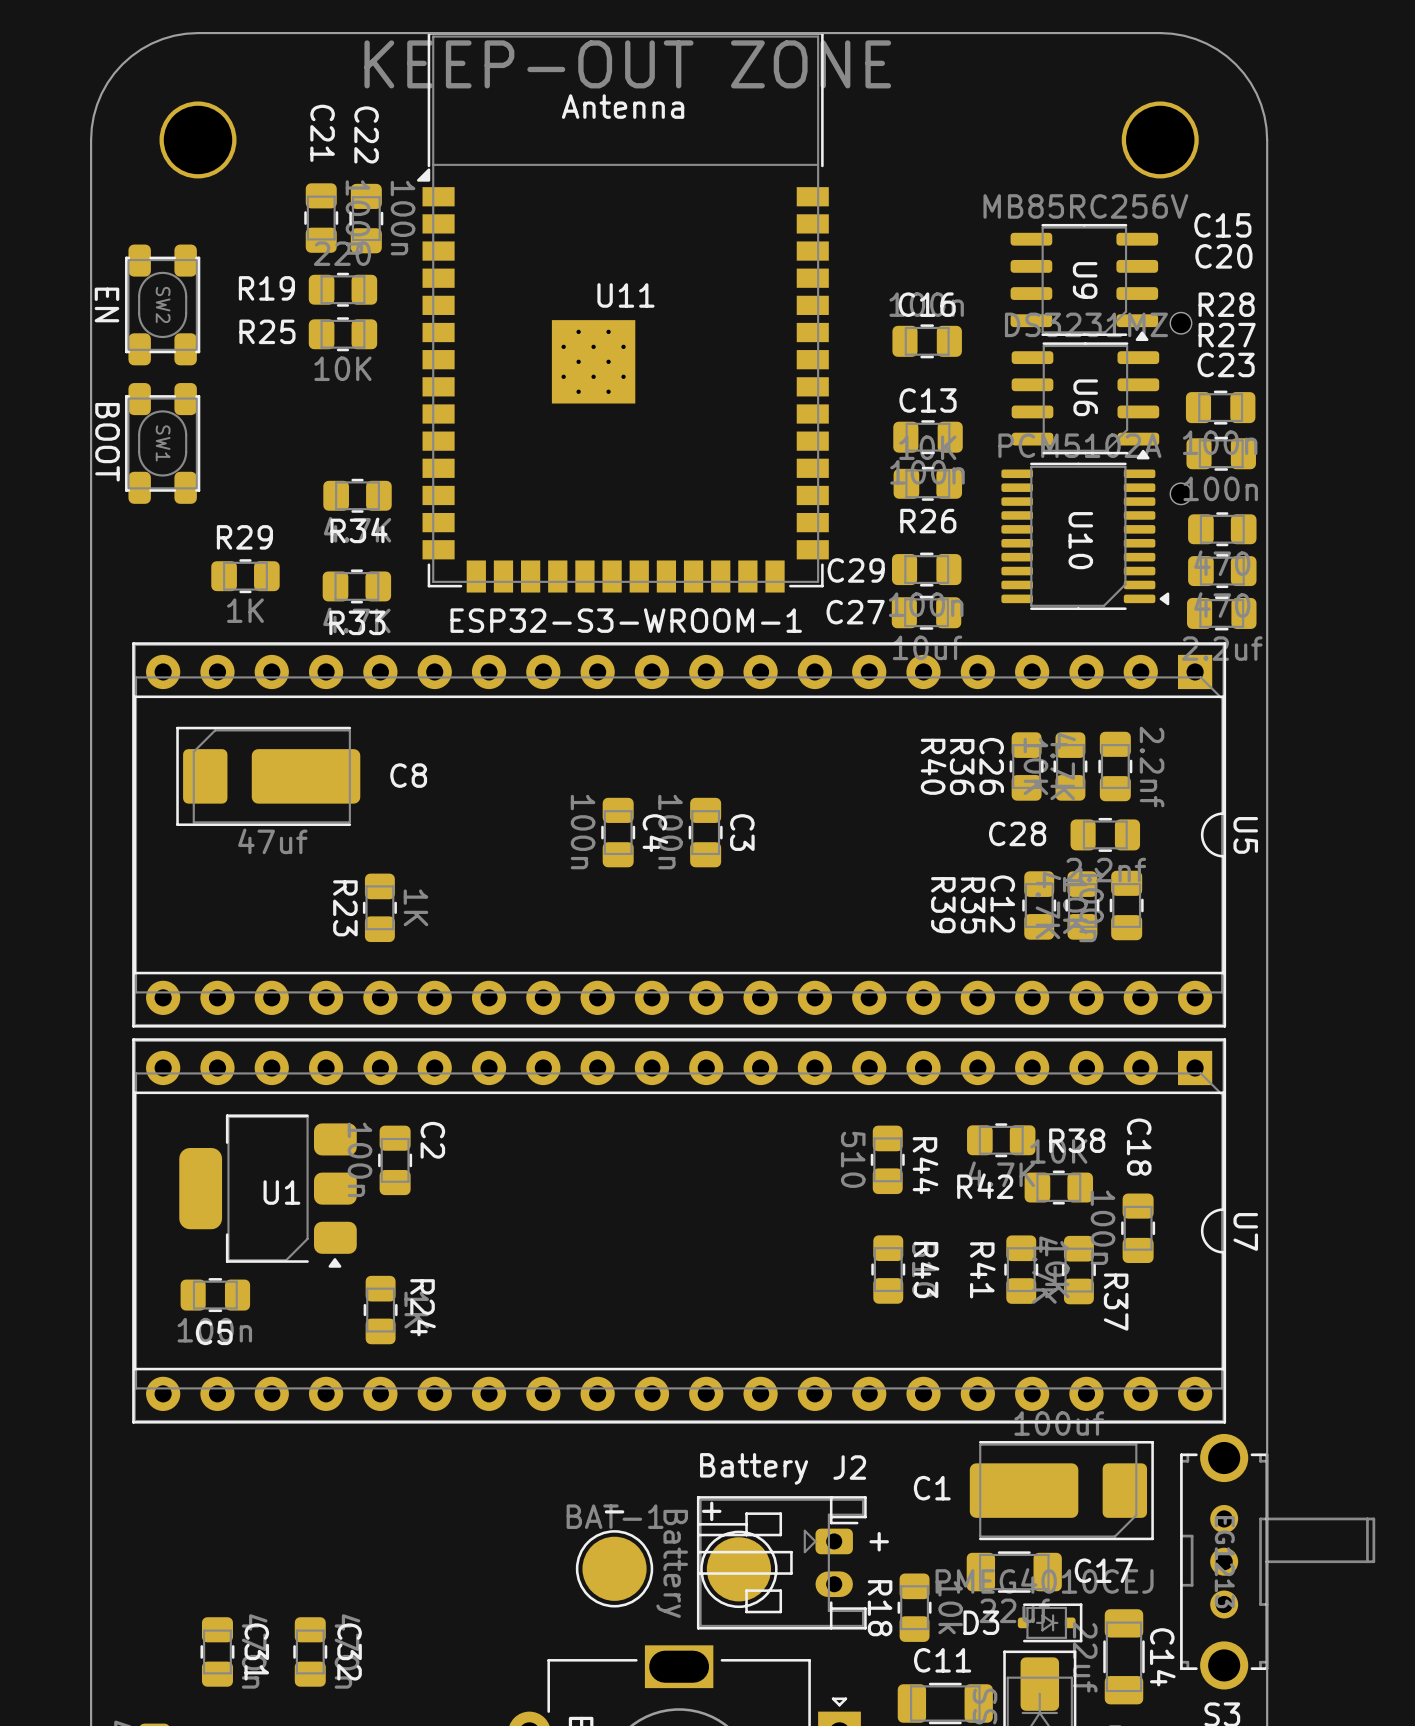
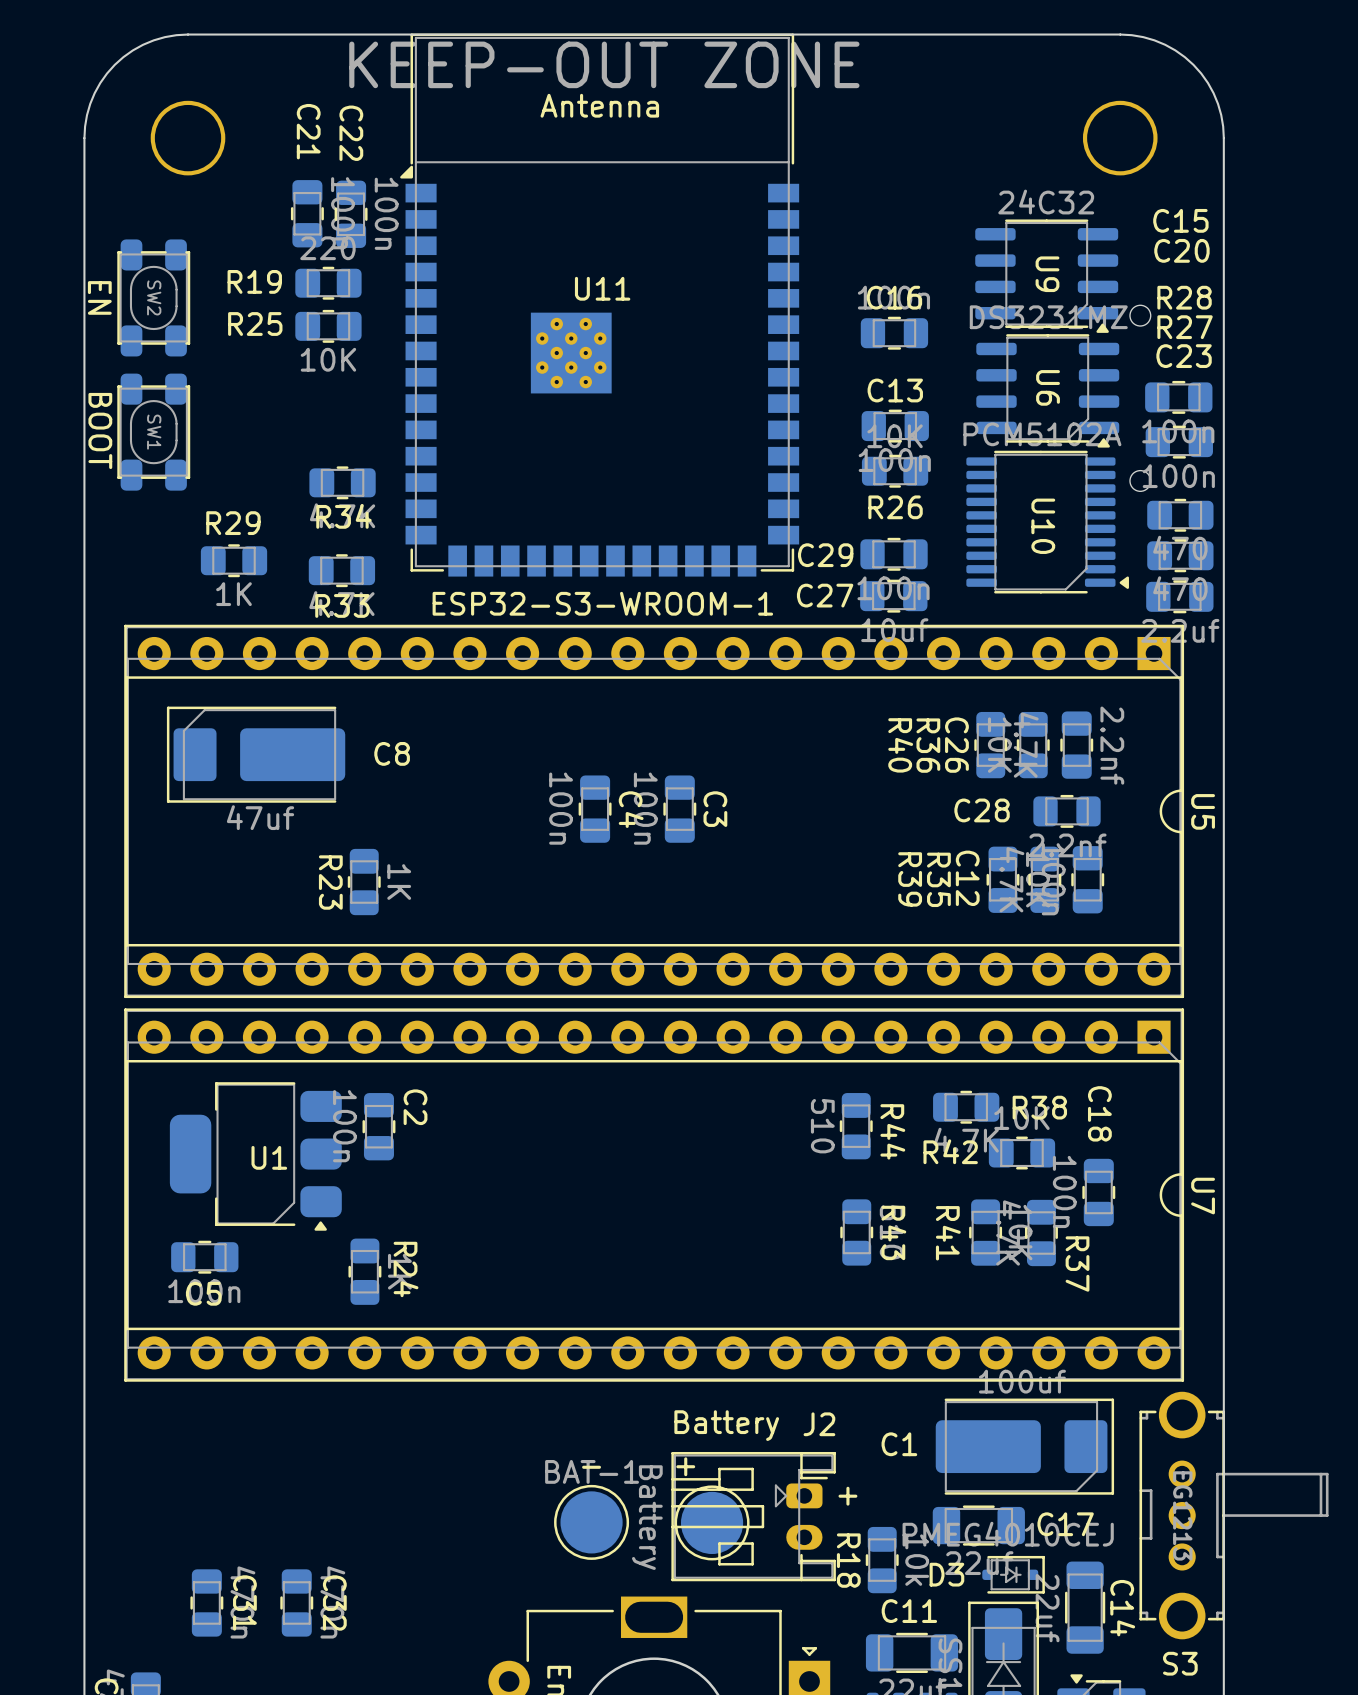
U9 value: MB85RC256V (1085, 206) -> 24С32 (1046, 202)

